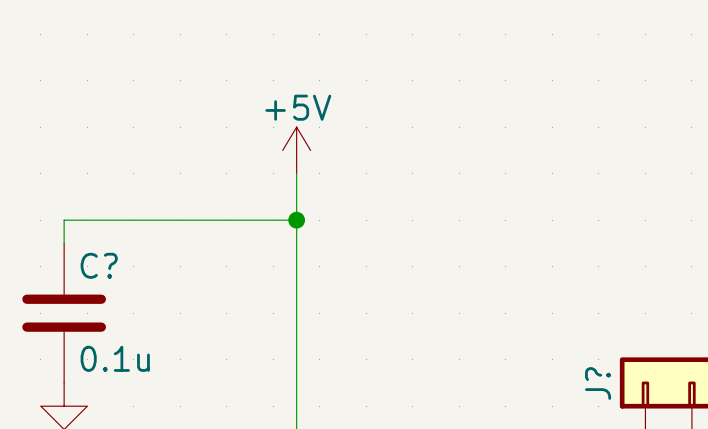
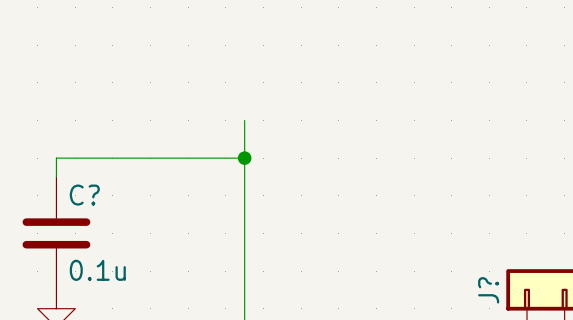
power symbol: +5V (296, 150) -> none

